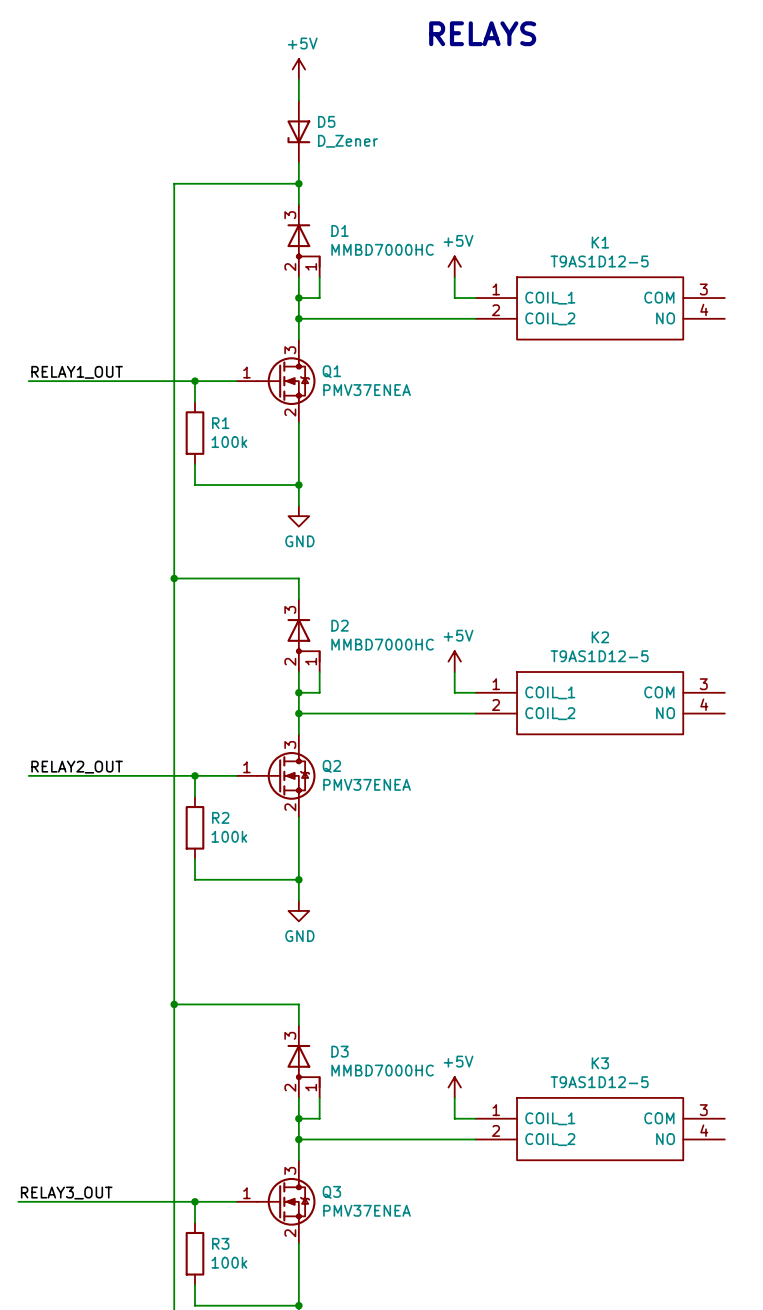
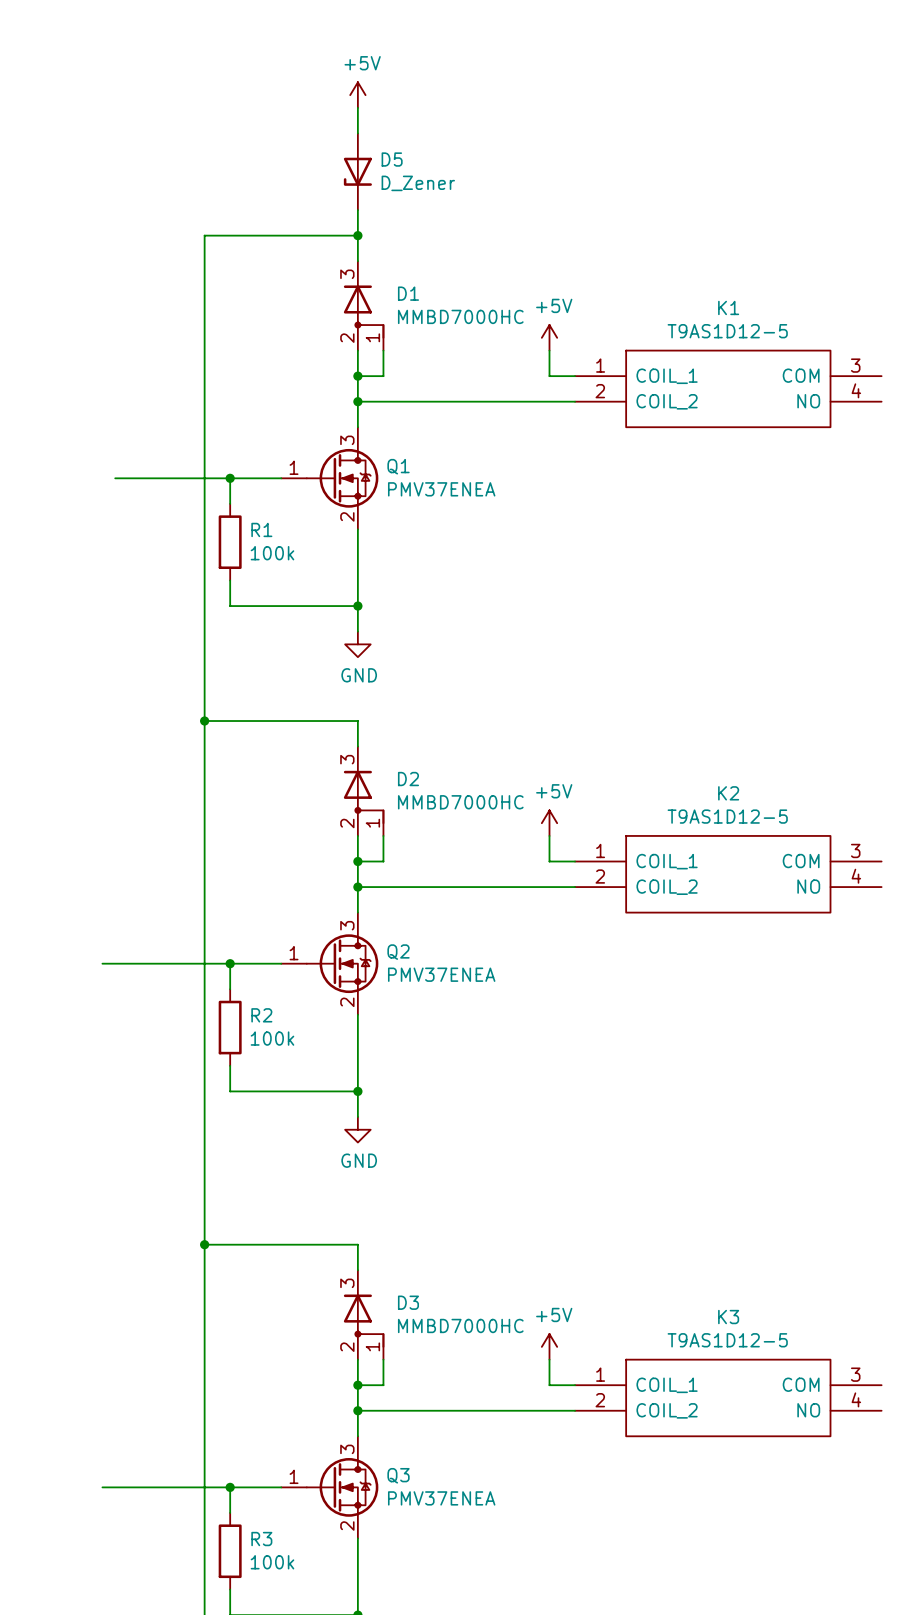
text: RELAYS (482, 33) -> none
label: RELAY1_OUT (77, 372) -> none
wire: (28, 381) (101, 381) -> none
label: RELAY2_OUT (77, 767) -> none
wire: (28, 775) (91, 775) -> none
label: RELAY3_OUT (66, 1193) -> none
wire: (18, 1201) (91, 1201) -> none

